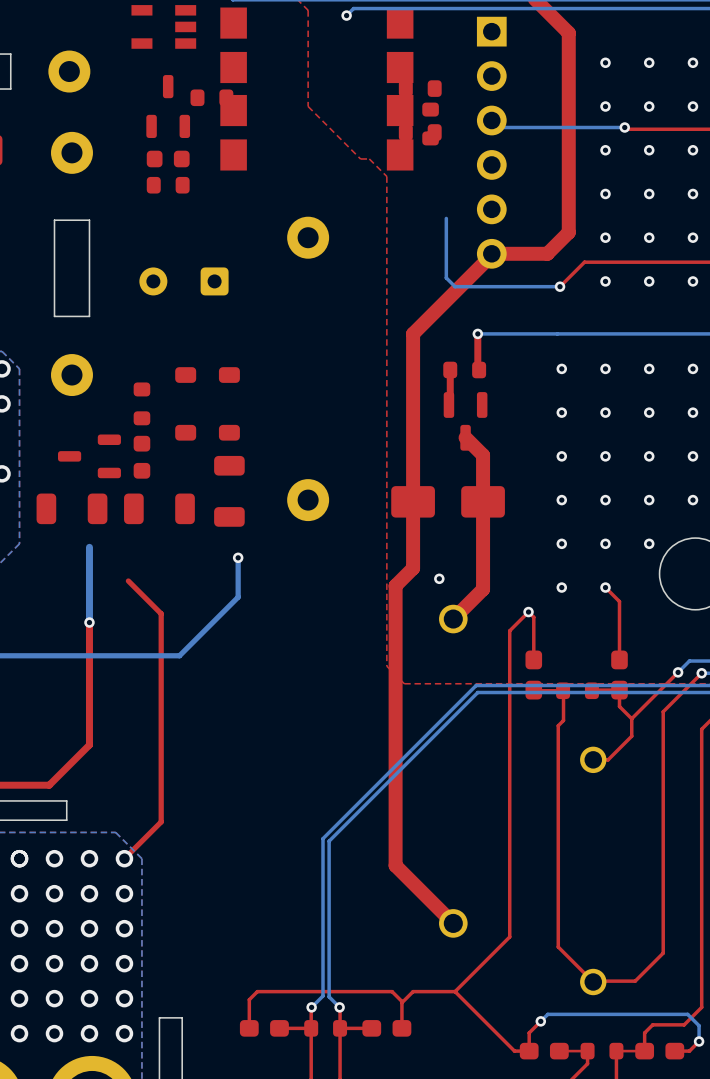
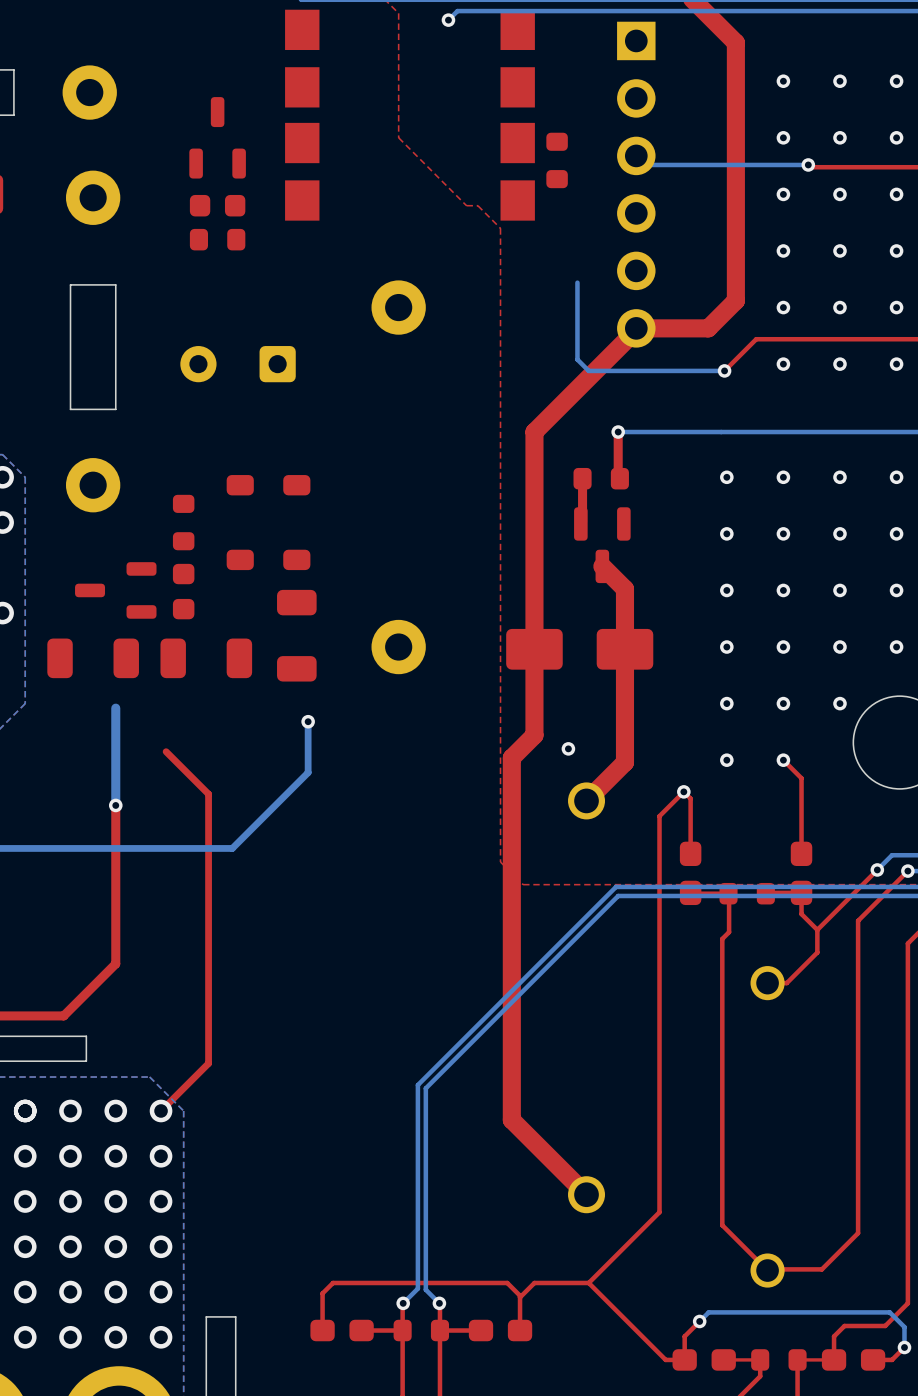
part: (163, 26) -> none
part: (420, 88) -> none
part: (211, 97) -> none
part: (420, 132) -> none

